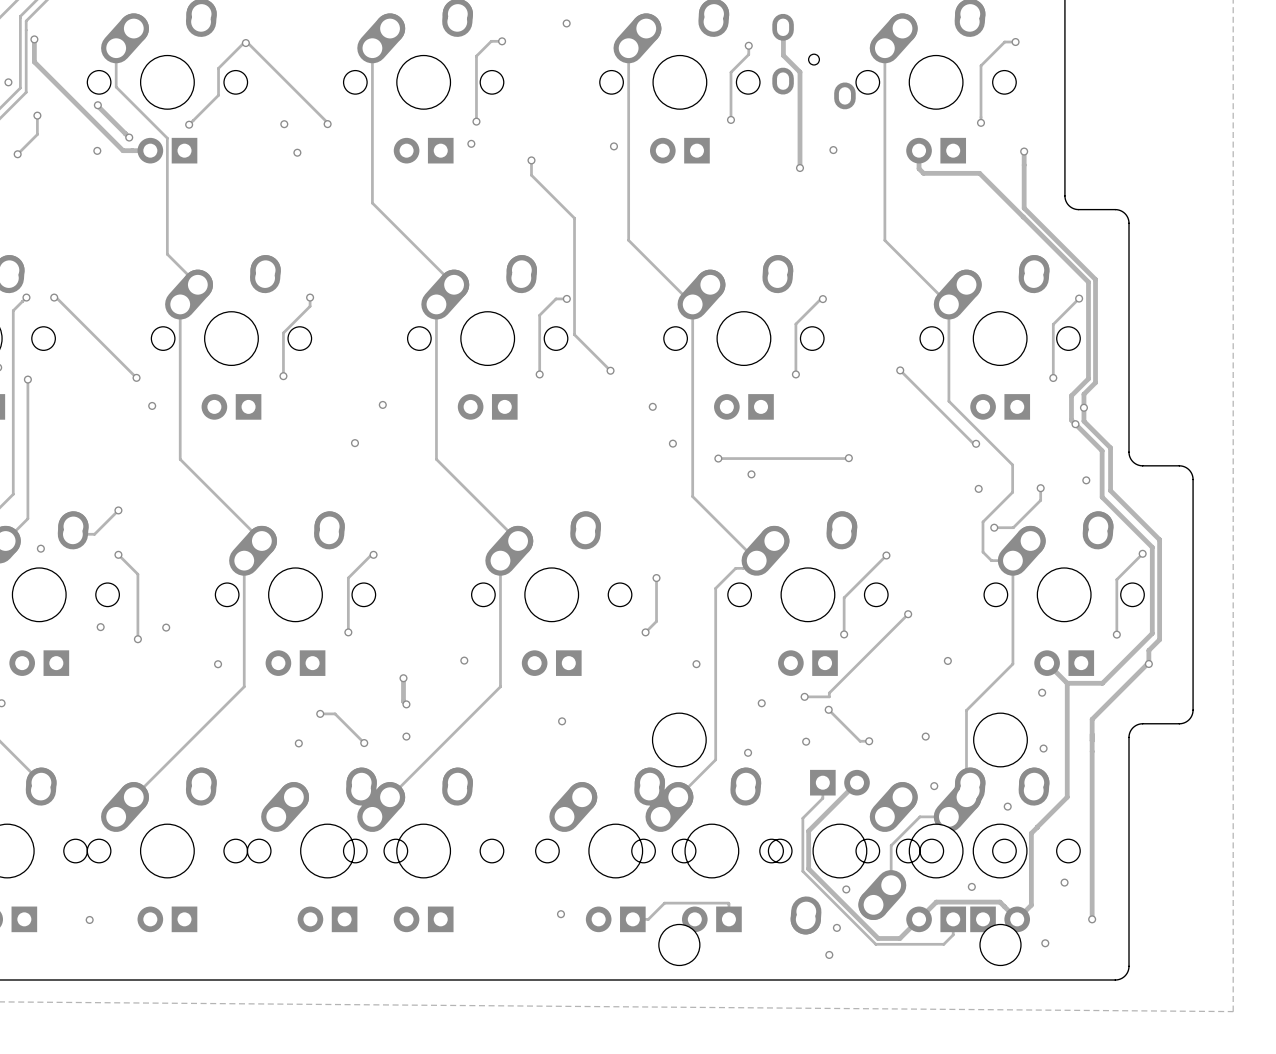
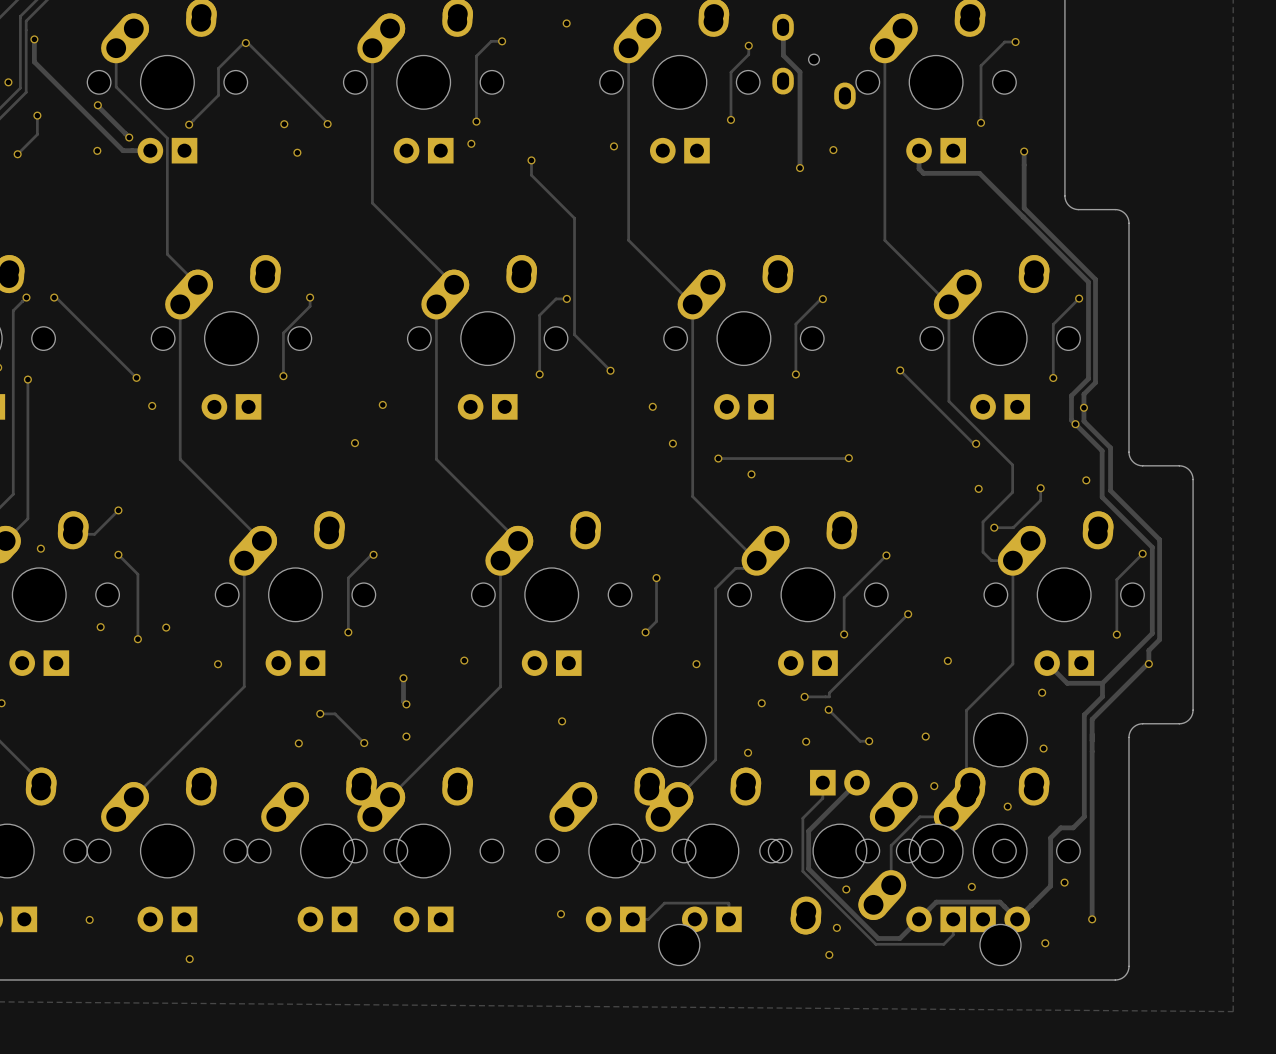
track: (1067, 683) (1067, 797) (1031, 833) (1031, 905) -> (1102, 683) (1102, 696) (1084, 714) (1084, 816) (1073, 827) (1060, 827) (1050, 837) (1050, 886) (1031, 905)
via: none -> (189, 959)

